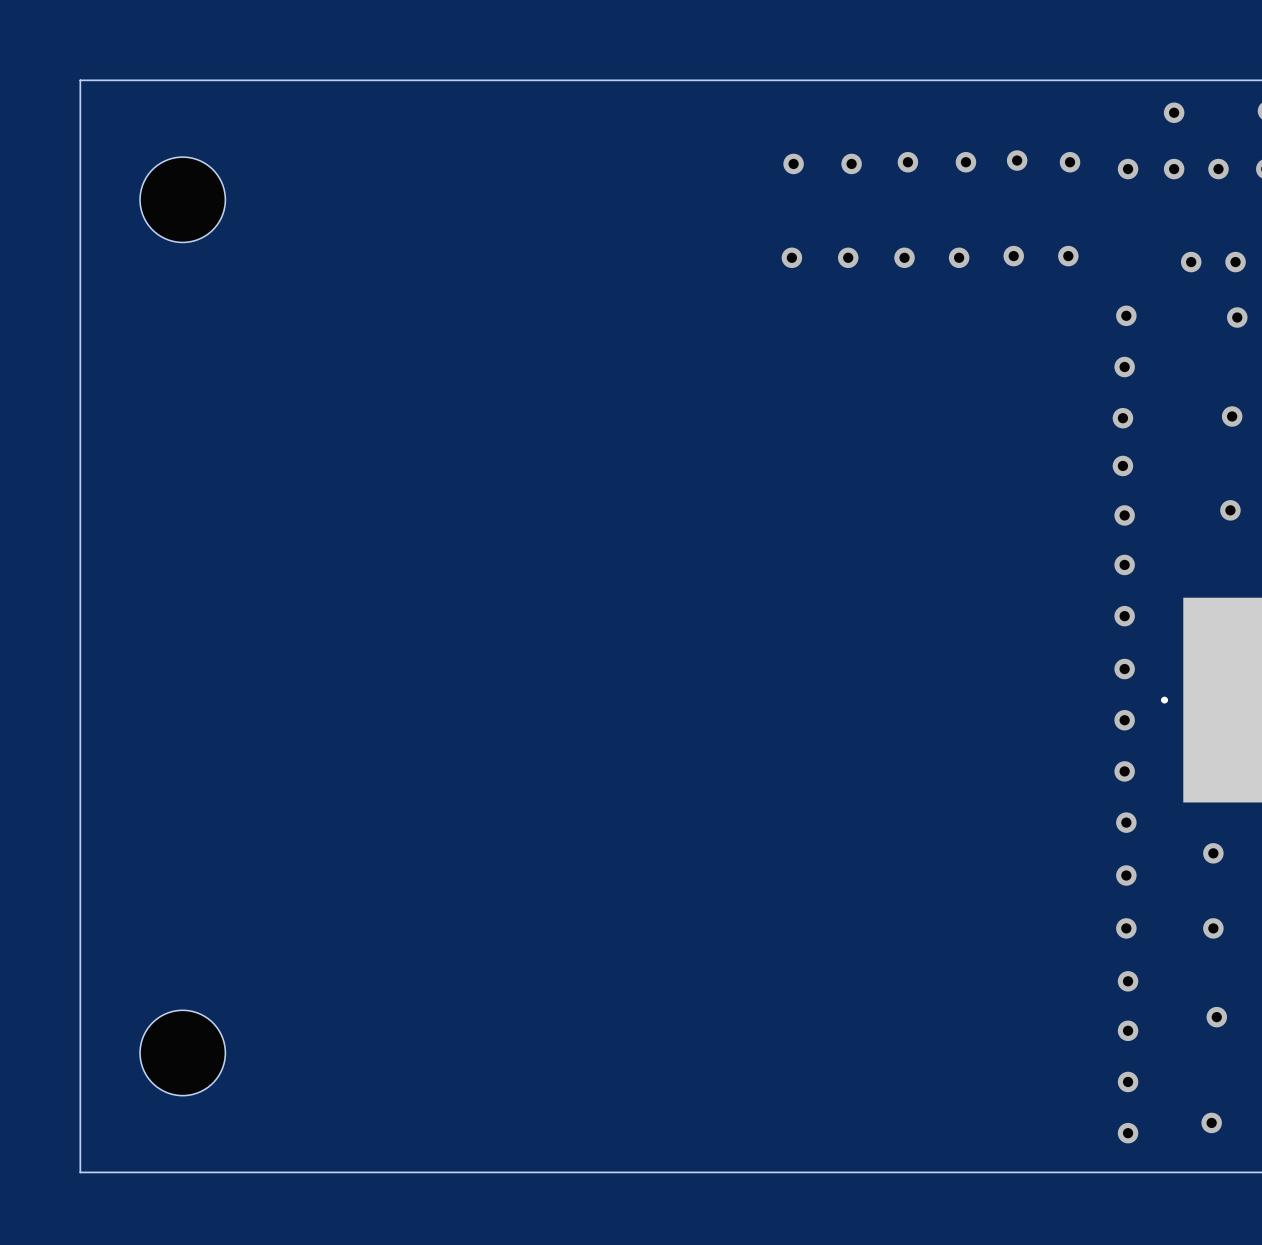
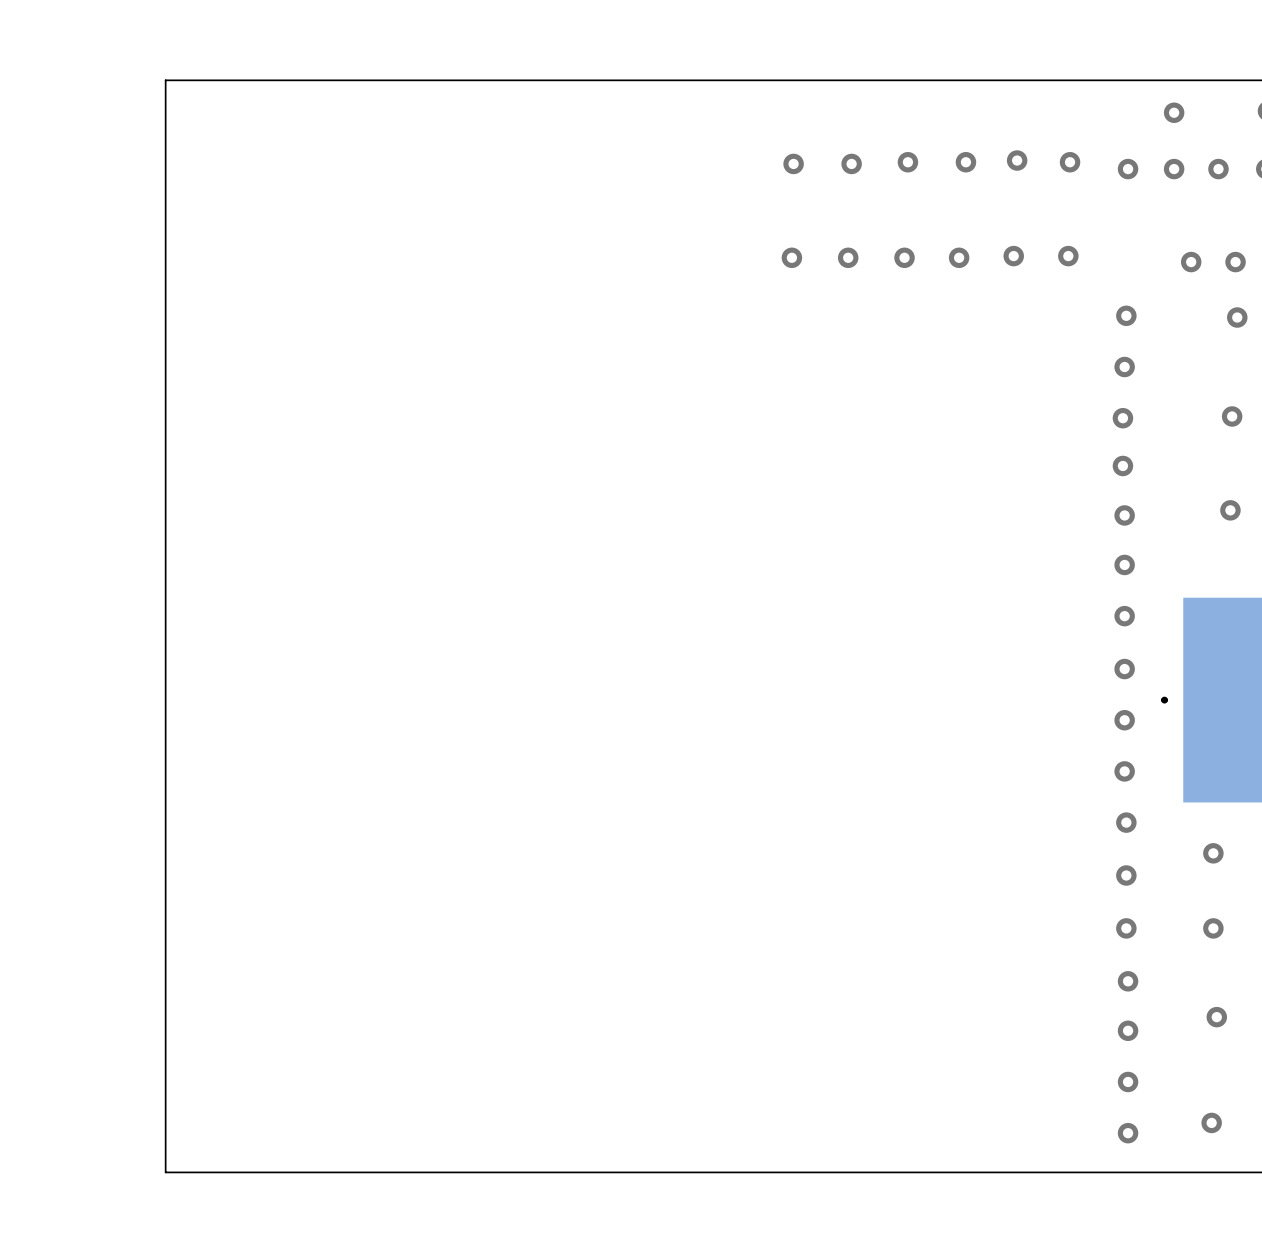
board edge: (165, 80) (80, 80) (80, 1172) (165, 1172) -> (165, 80) (165, 1172)
part: (182, 199) -> none
part: (182, 1052) -> none

